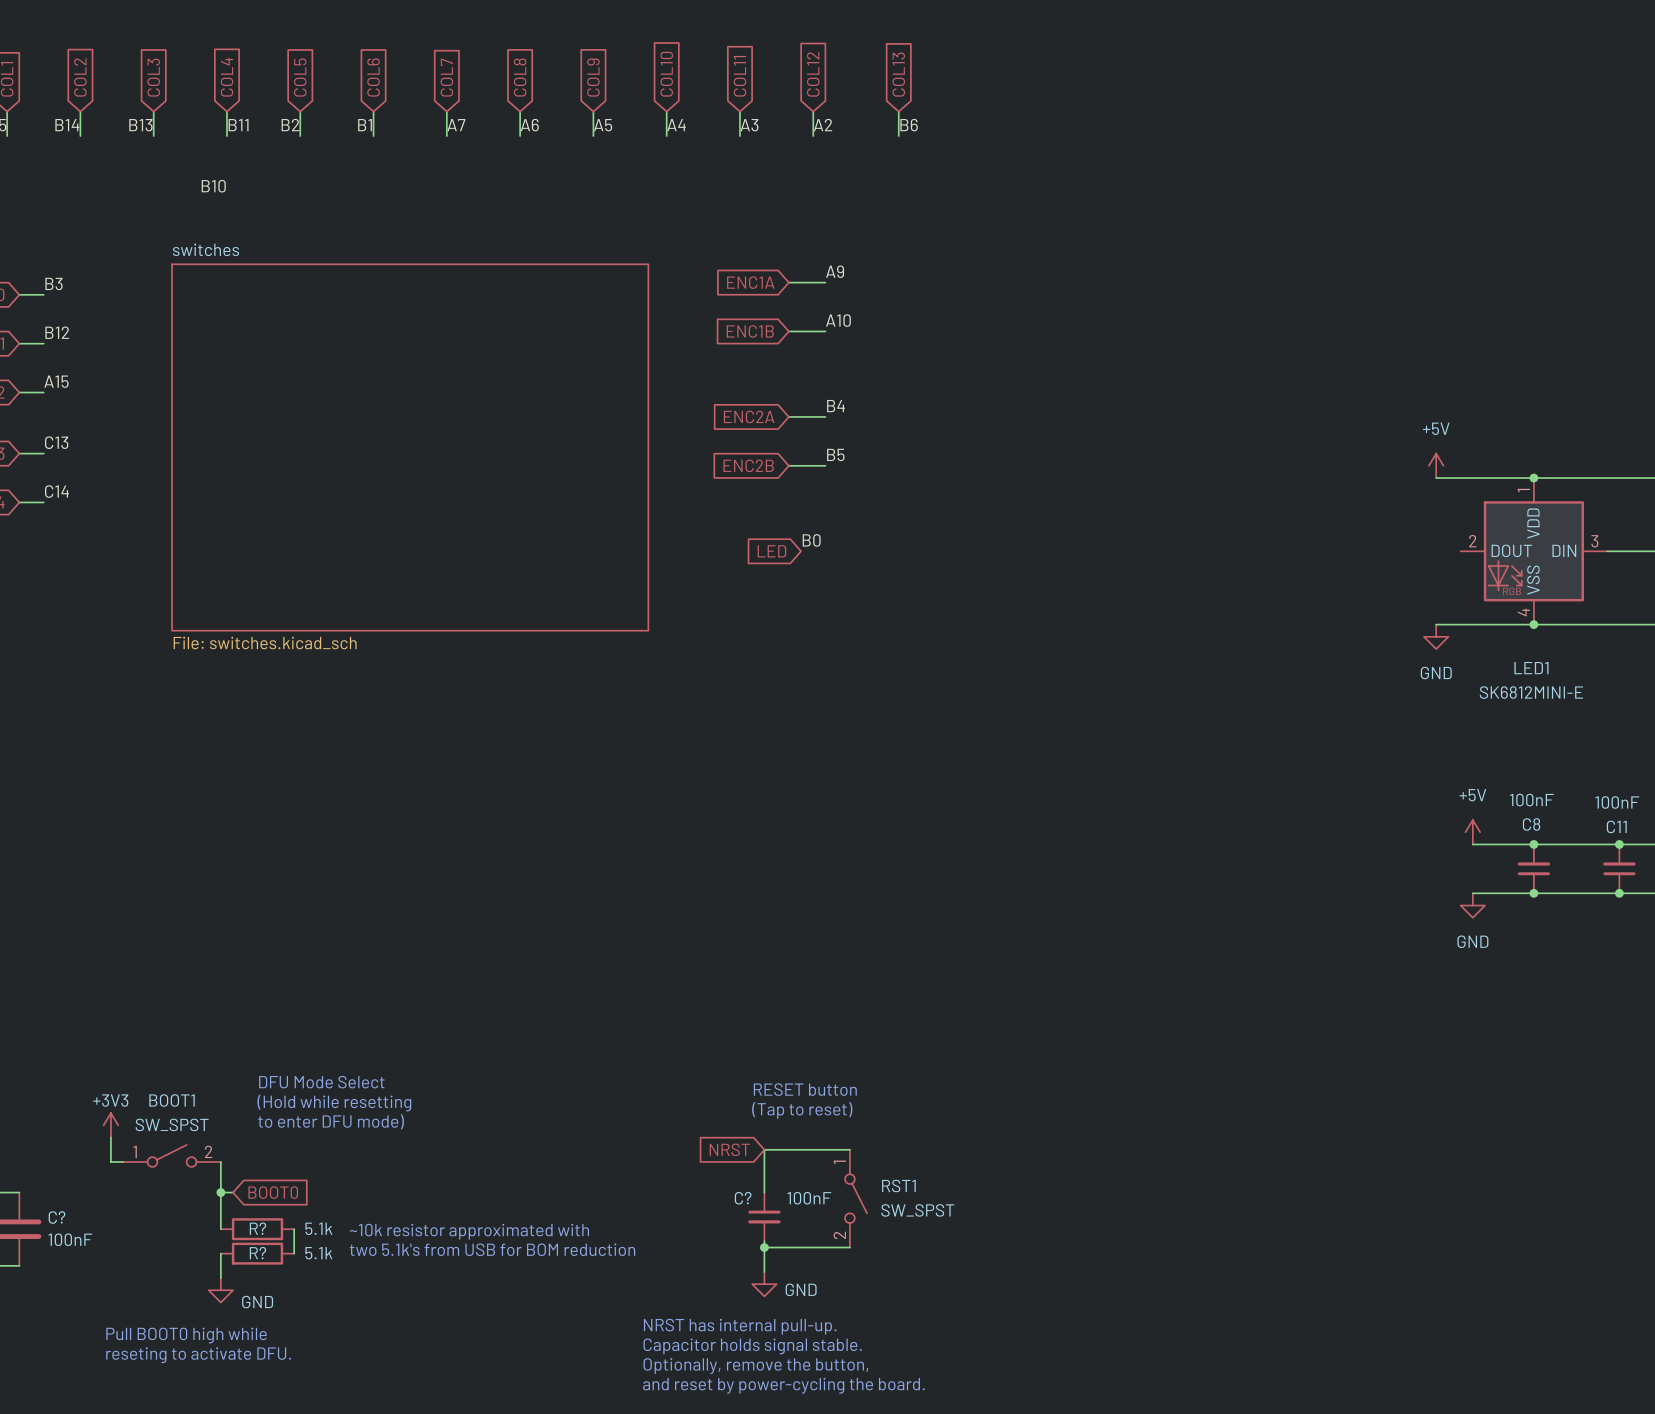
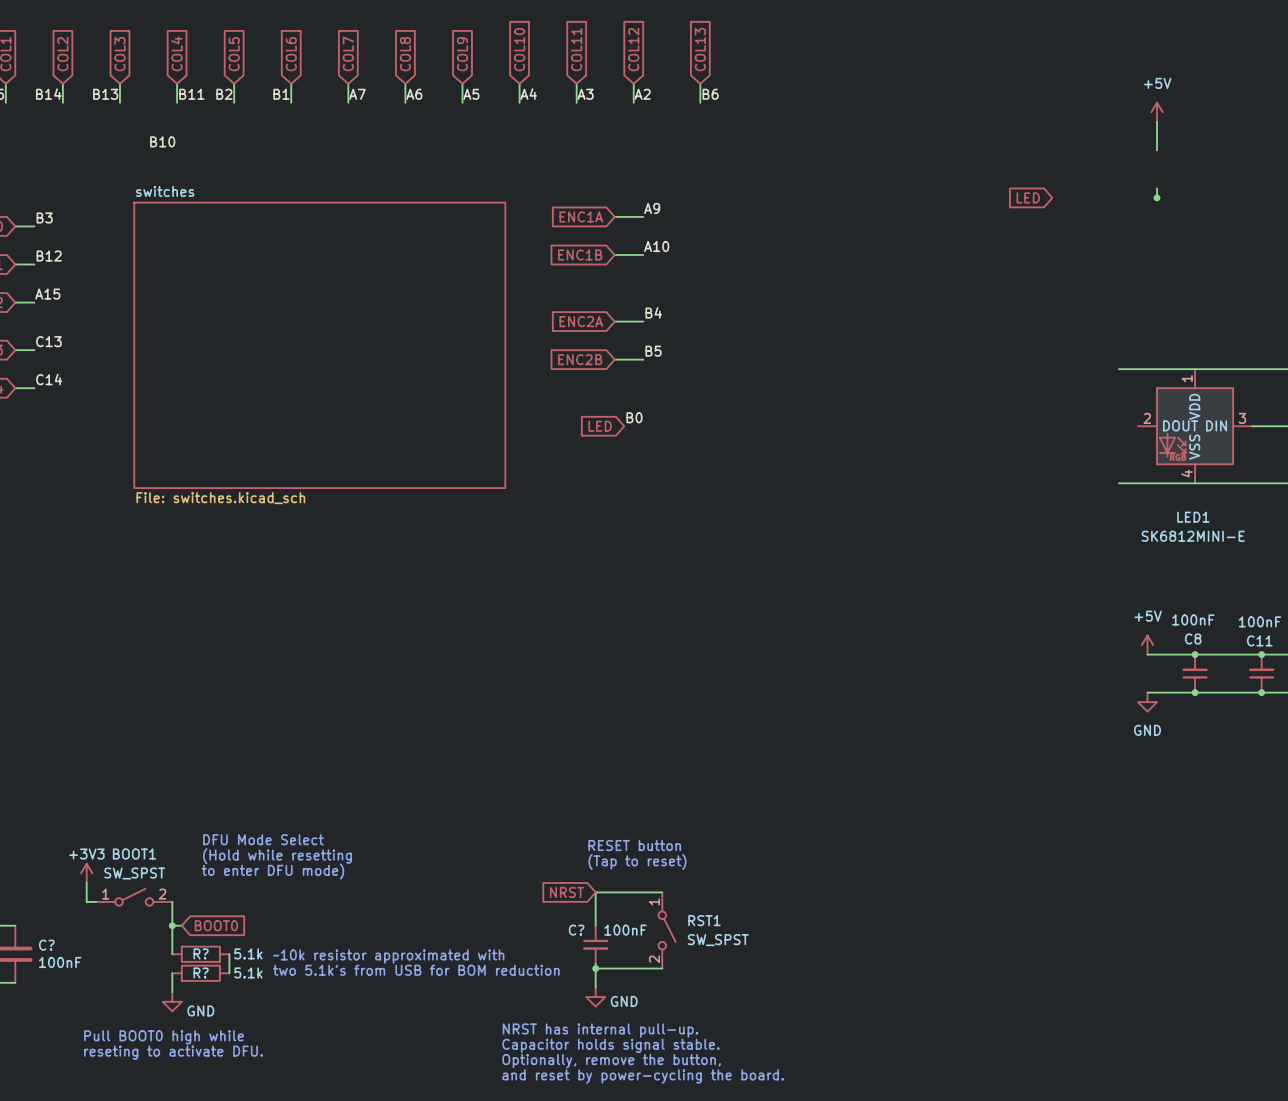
power symbol: none -> +5V (1157, 112)
wire: none -> (1157, 121) (1157, 150)
wire: none -> (1157, 188) (1157, 197)
global label: none -> LED (1028, 197)
junction: none -> (1157, 197)
power symbol: +5V (1436, 465) -> none
junction: (1533, 478) -> none
junction: (1533, 624) -> none
power symbol: GND (1436, 636) -> none

